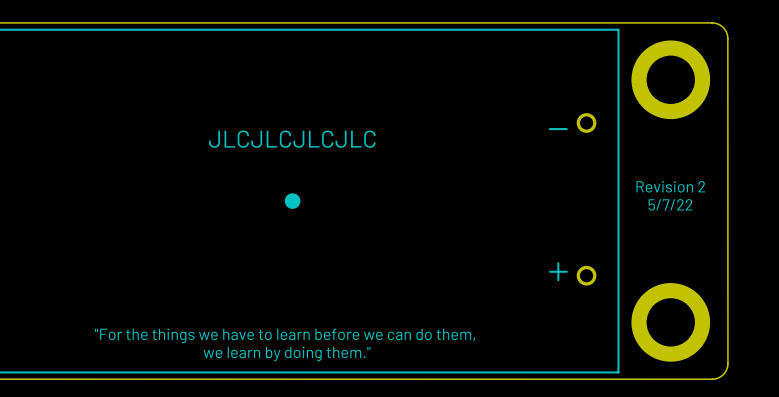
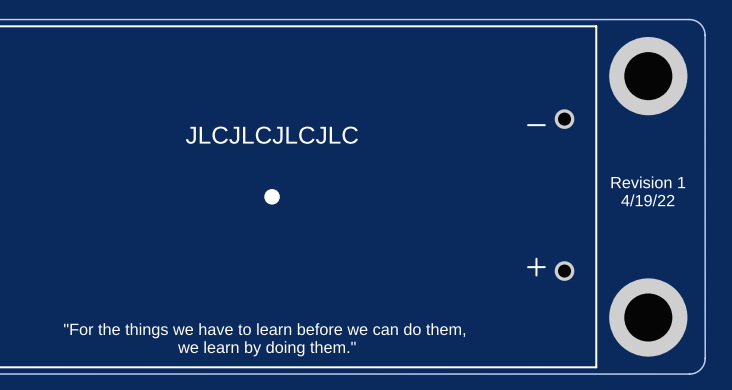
text: Revision 2 (670, 186) -> Revision 1 (648, 182)
text: 5/7/22 (670, 204) -> 4/19/22 (647, 200)

